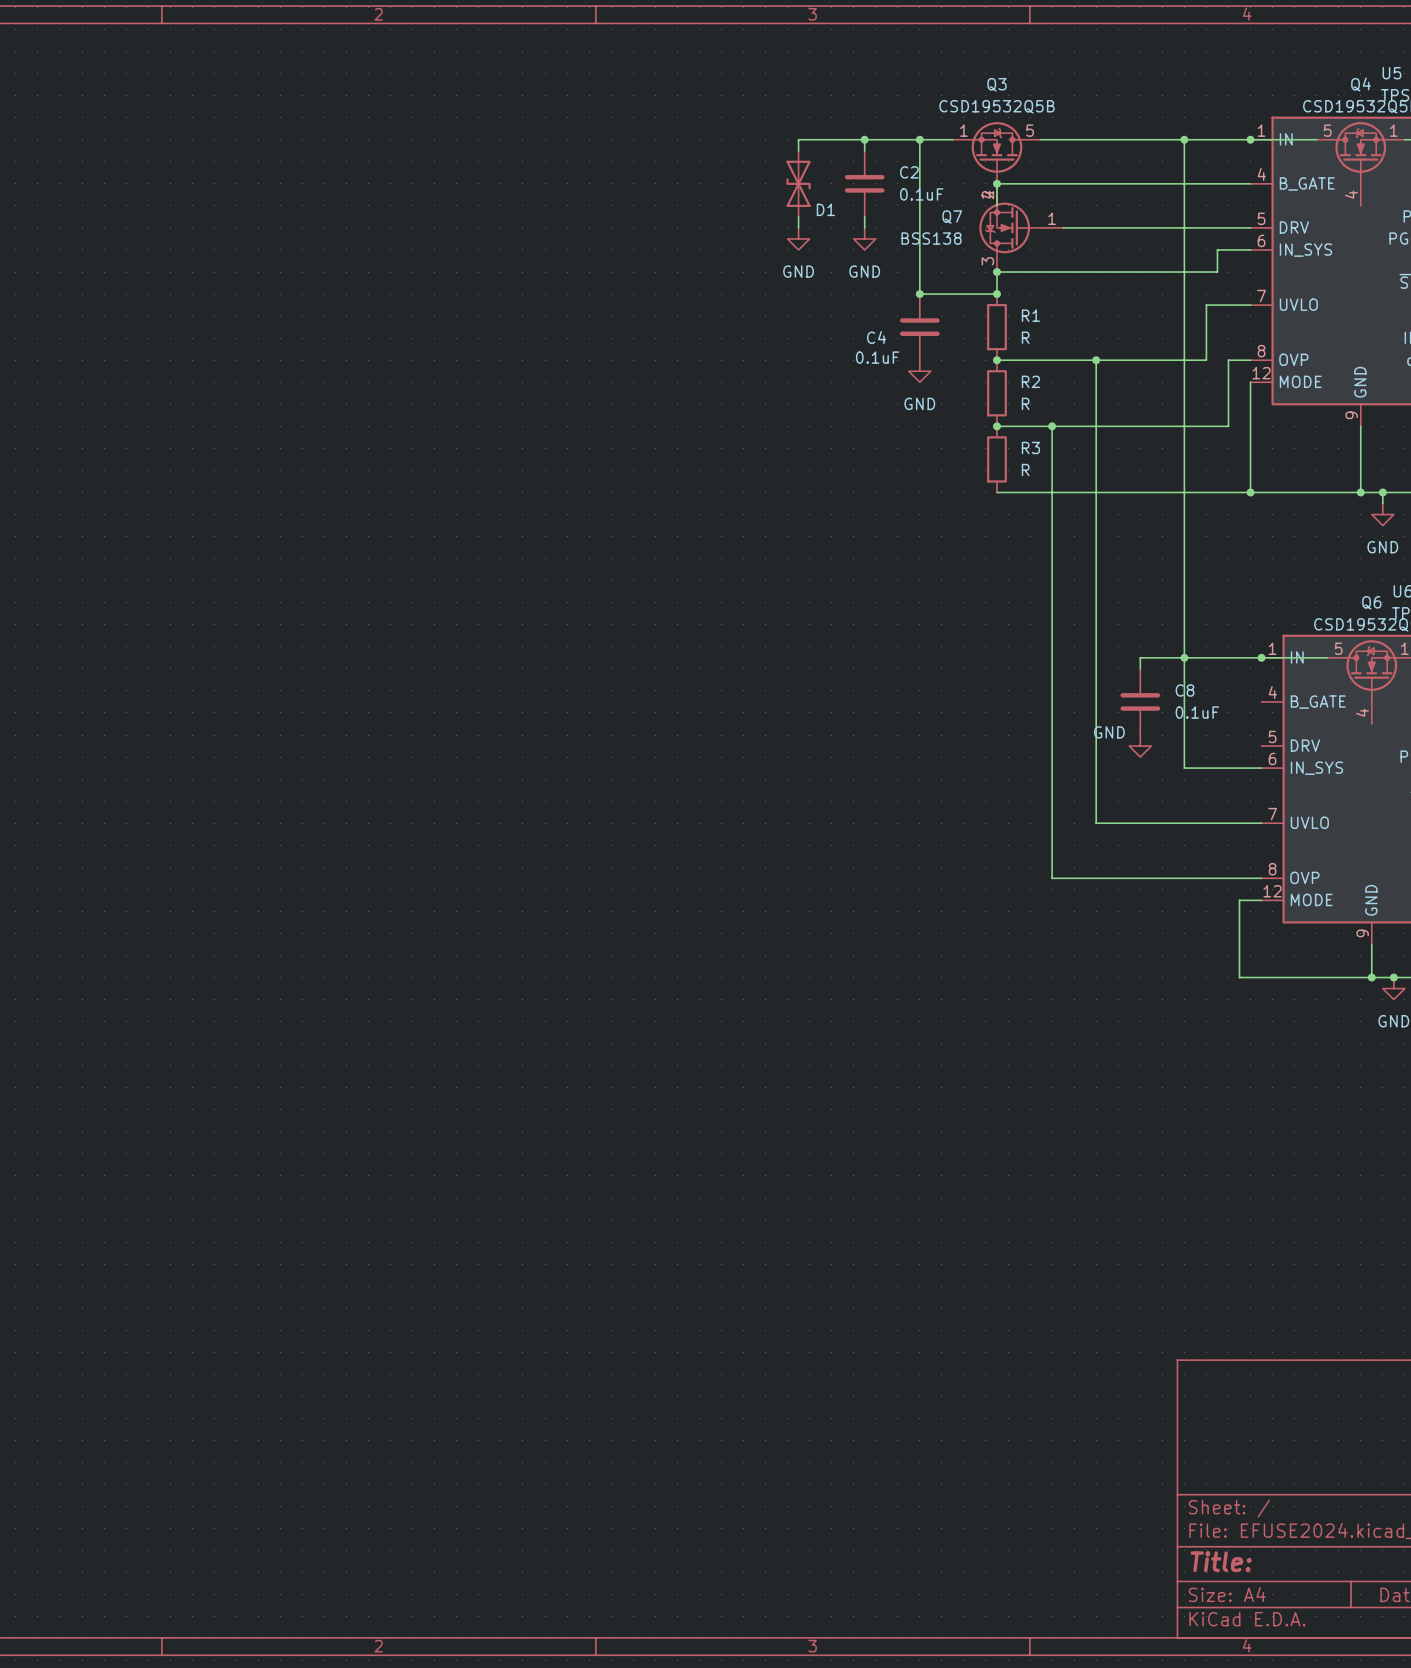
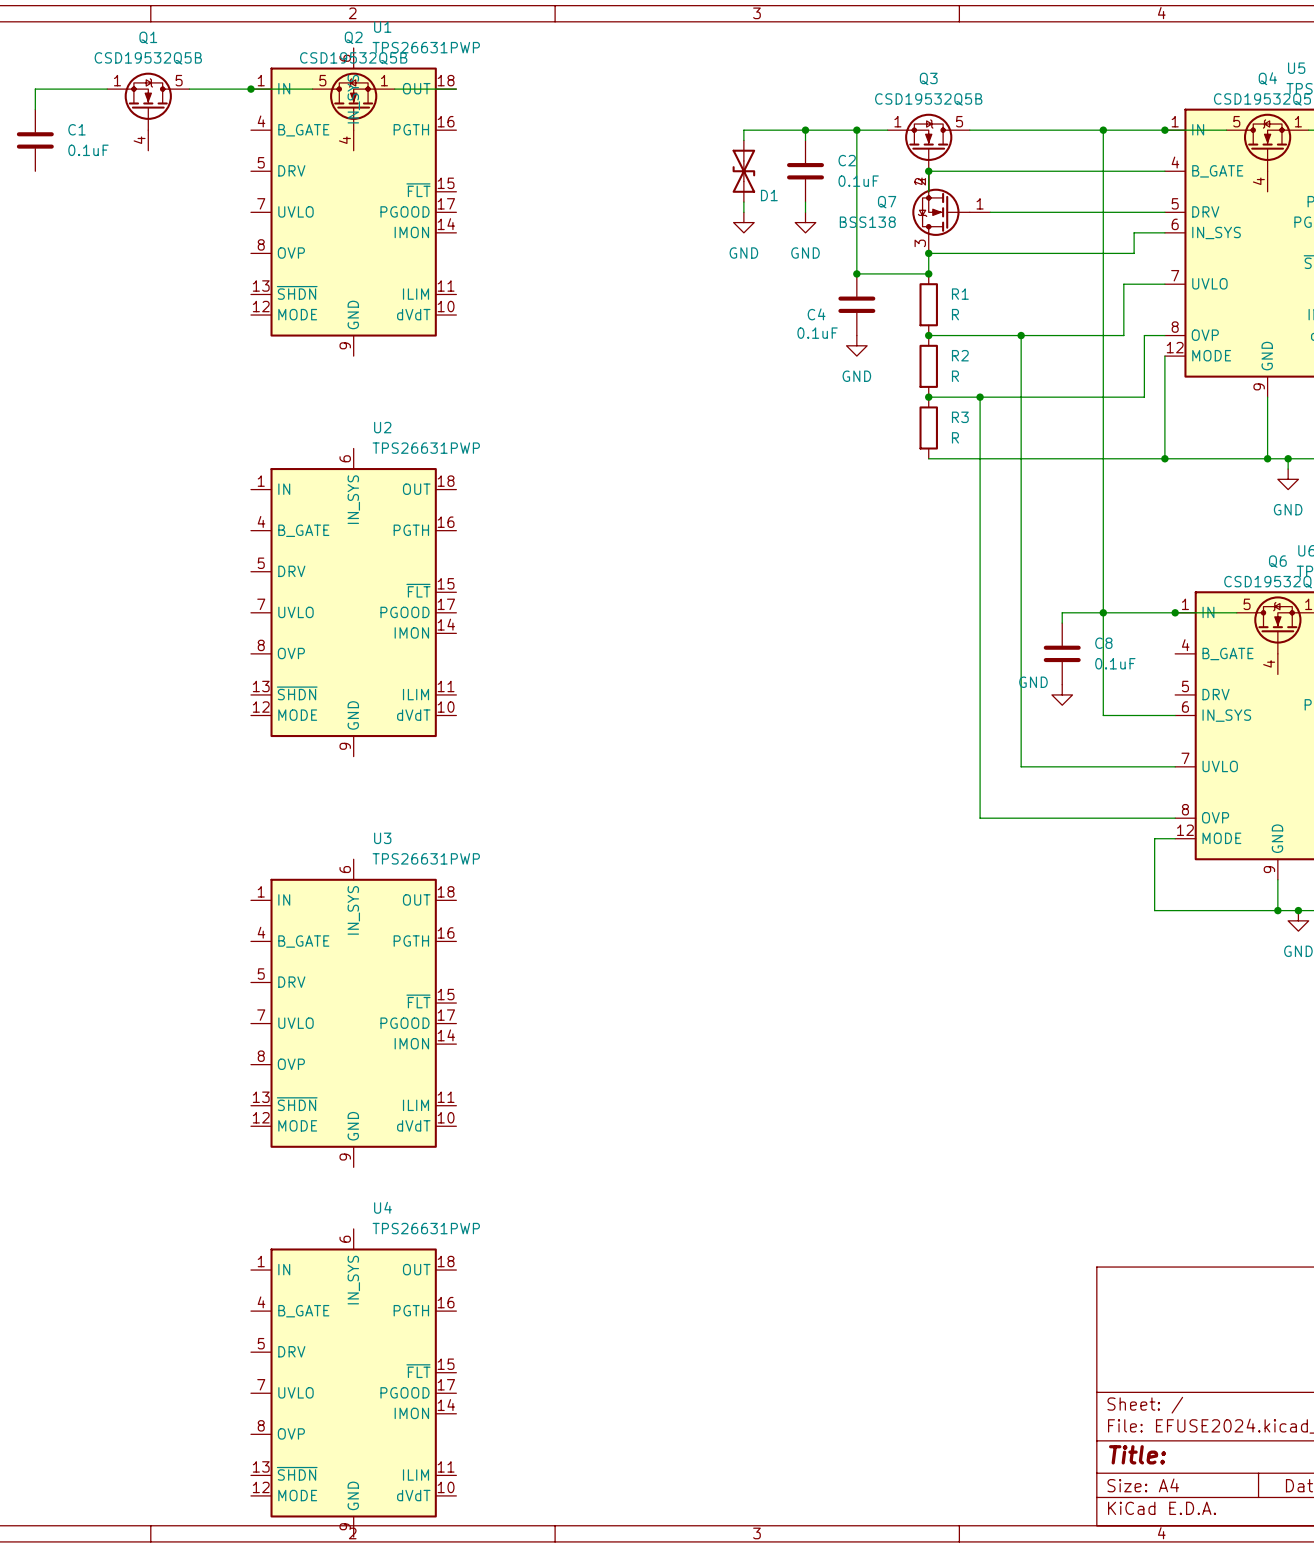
wire: none -> (107, 89) (35, 89) (35, 109)
wire: none -> (189, 89) (312, 89)
junction: none -> (250, 89)
wire: none -> (394, 89) (456, 89)
Q1: none -> CSD19532Q5B (148, 111)
Q2: none -> CSD19532Q5B (353, 111)
C1: none -> 0.1uF (35, 140)
U1: none -> TPS26631PWP (353, 202)
U2: none -> TPS26631PWP (353, 602)
U3: none -> TPS26631PWP (353, 1013)
U4: none -> TPS26631PWP (353, 1382)

